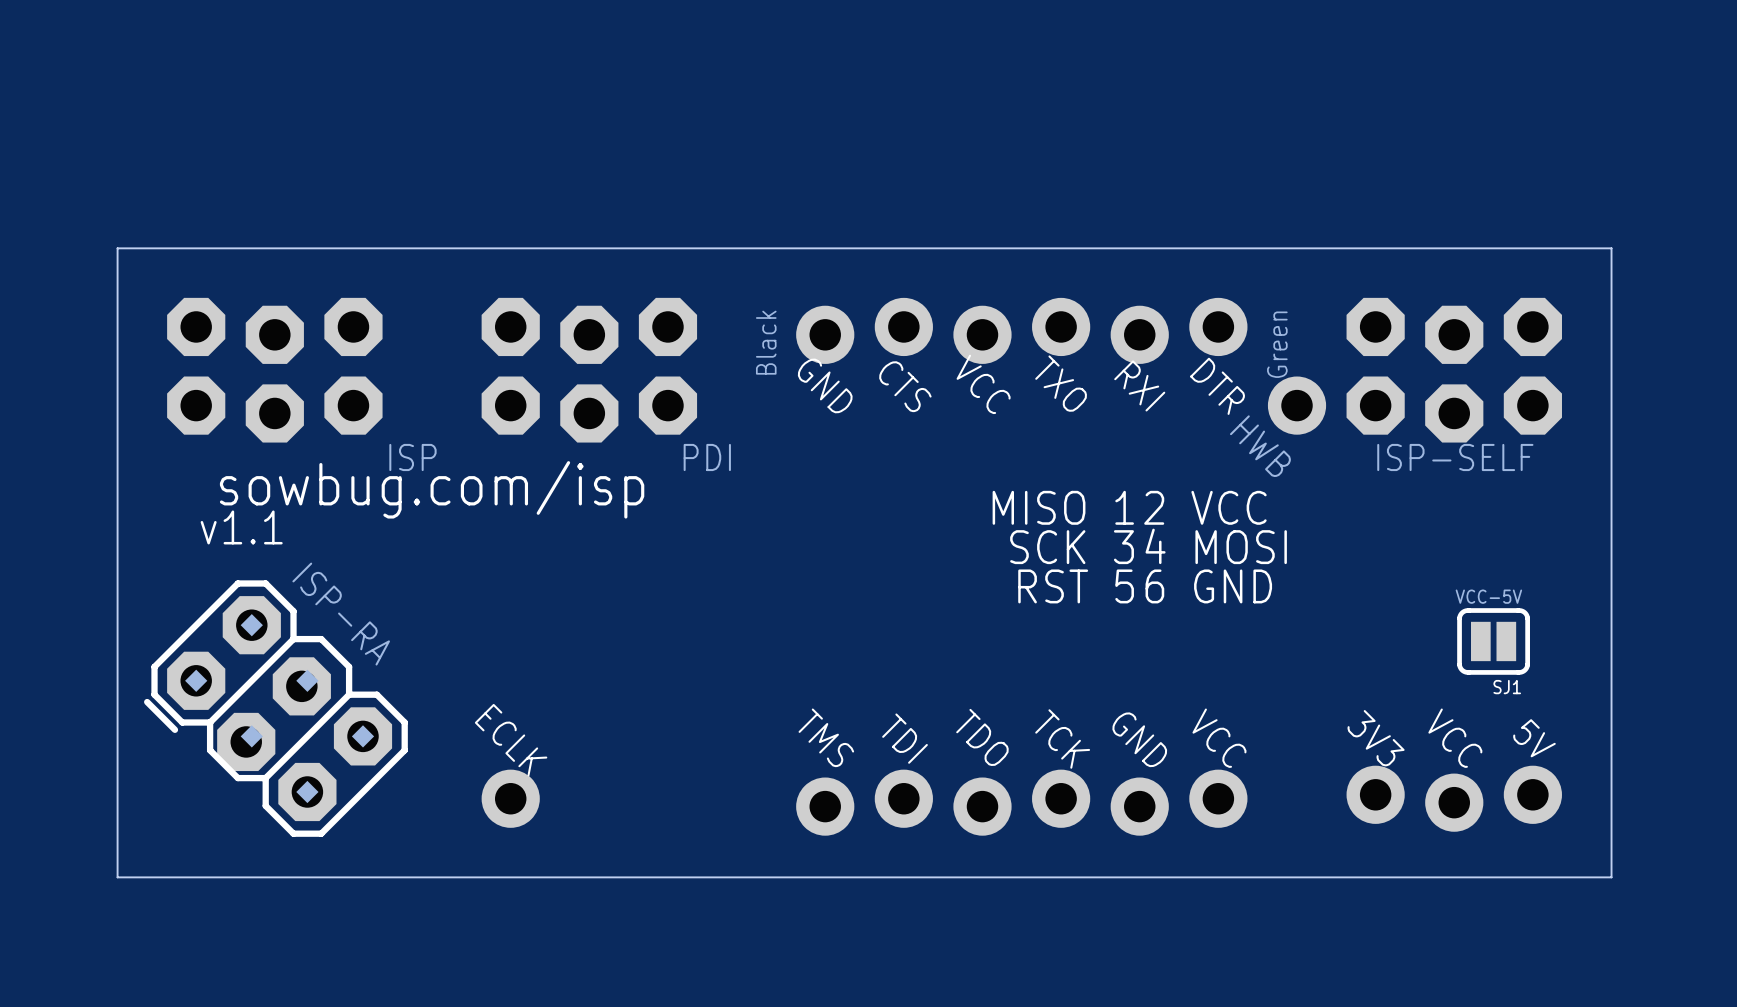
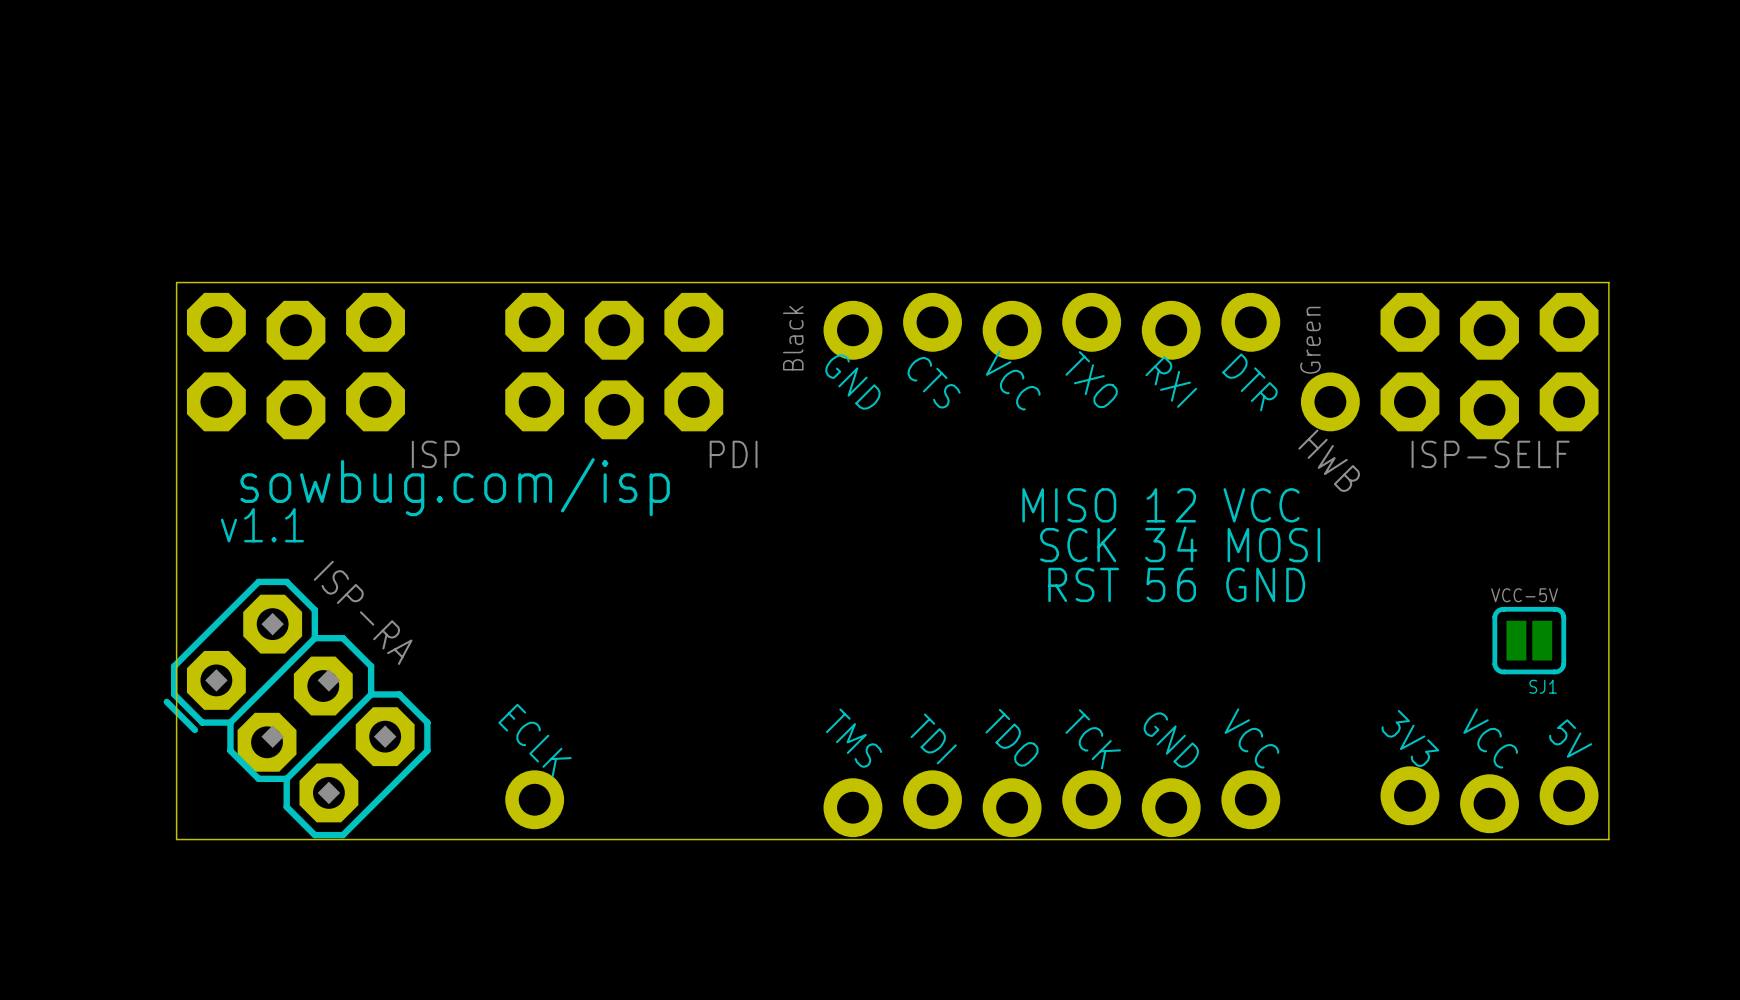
board edge: (1611, 248) (1611, 877) (117, 877) (117, 248) (1611, 248) -> (1608, 282) (1608, 839) (176, 839) (176, 282) (1608, 282)
part value position: HWB (1260, 446) -> HWB (1329, 460)

